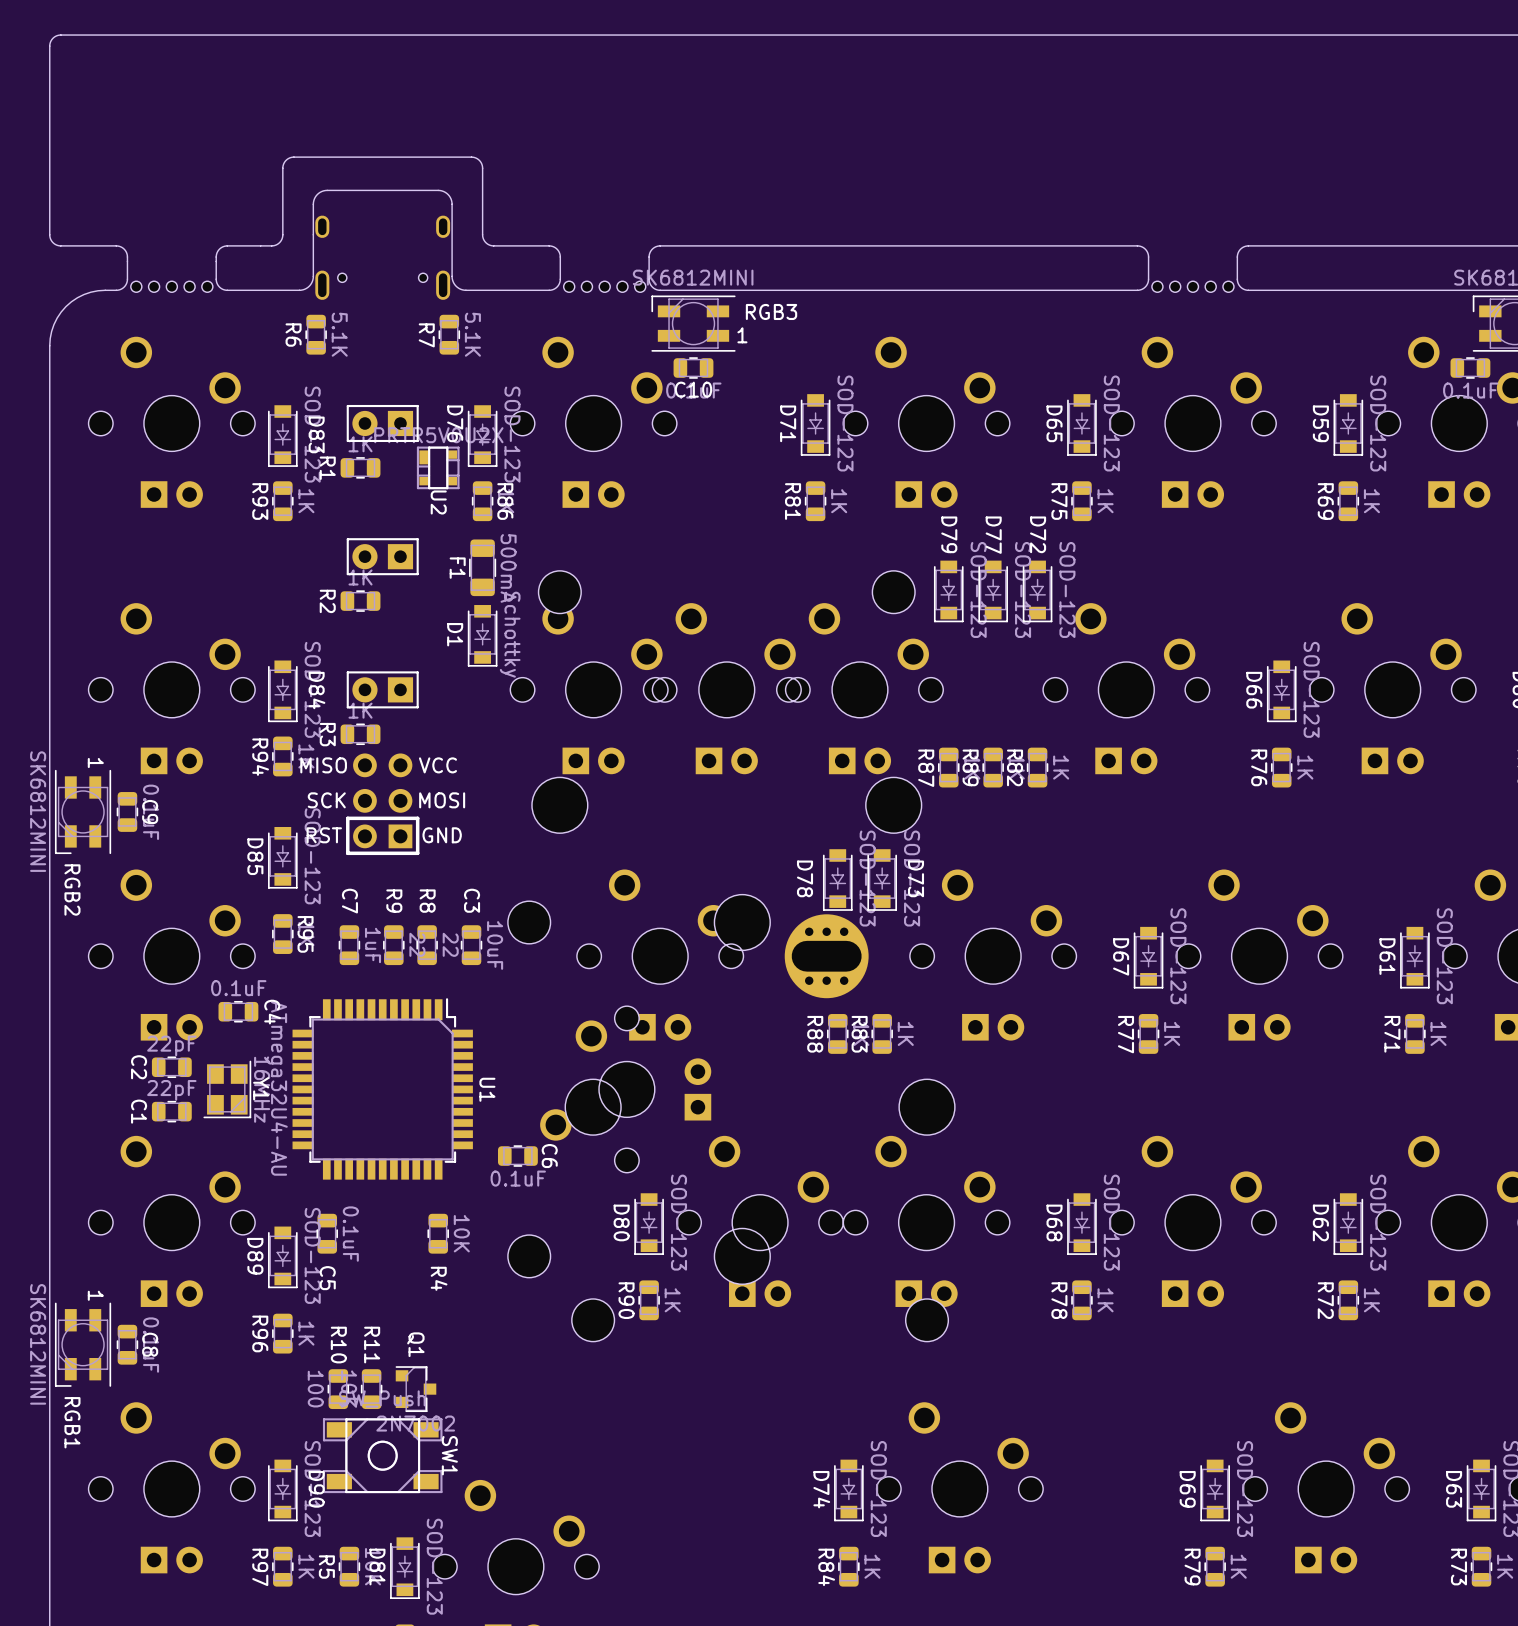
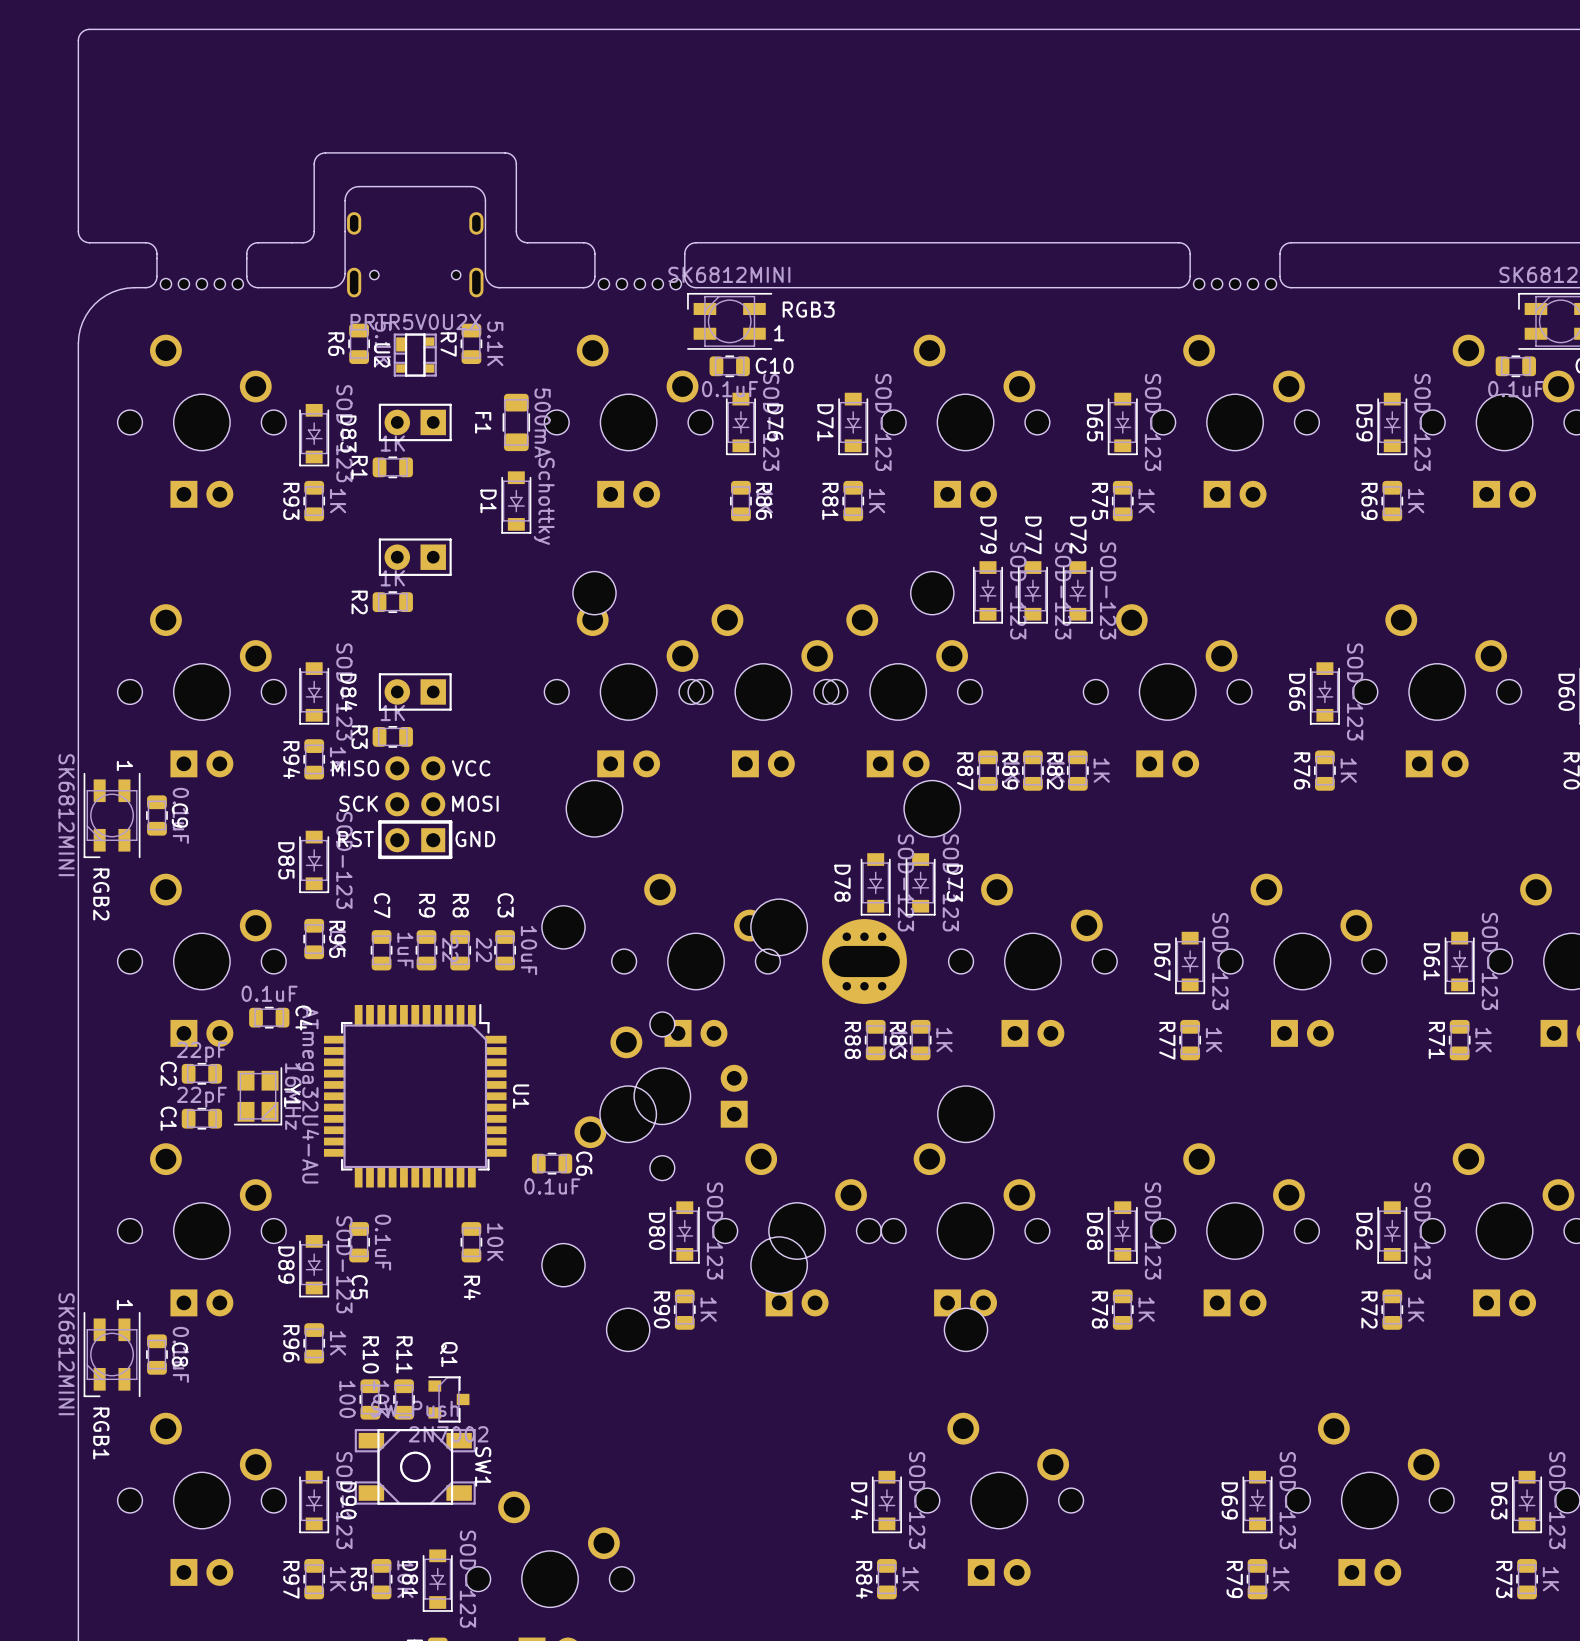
R6 position: (316, 334) -> (359, 343)
R7 position: (449, 334) -> (471, 343)
C10 name position: C10 (693, 389) -> C10 (774, 365)
D76 name position: D76 (455, 423) -> D76 (775, 422)
D76 position: (482, 436) -> (740, 423)
U2 position: (438, 467) -> (415, 355)
R86 position: (482, 501) -> (740, 501)
U2 name position: U2 (438, 502) -> U2 (382, 355)
F1 position: (482, 567) -> (516, 422)
F1 name position: F1 (457, 568) -> F1 (483, 422)
D1 position: (482, 635) -> (516, 502)

